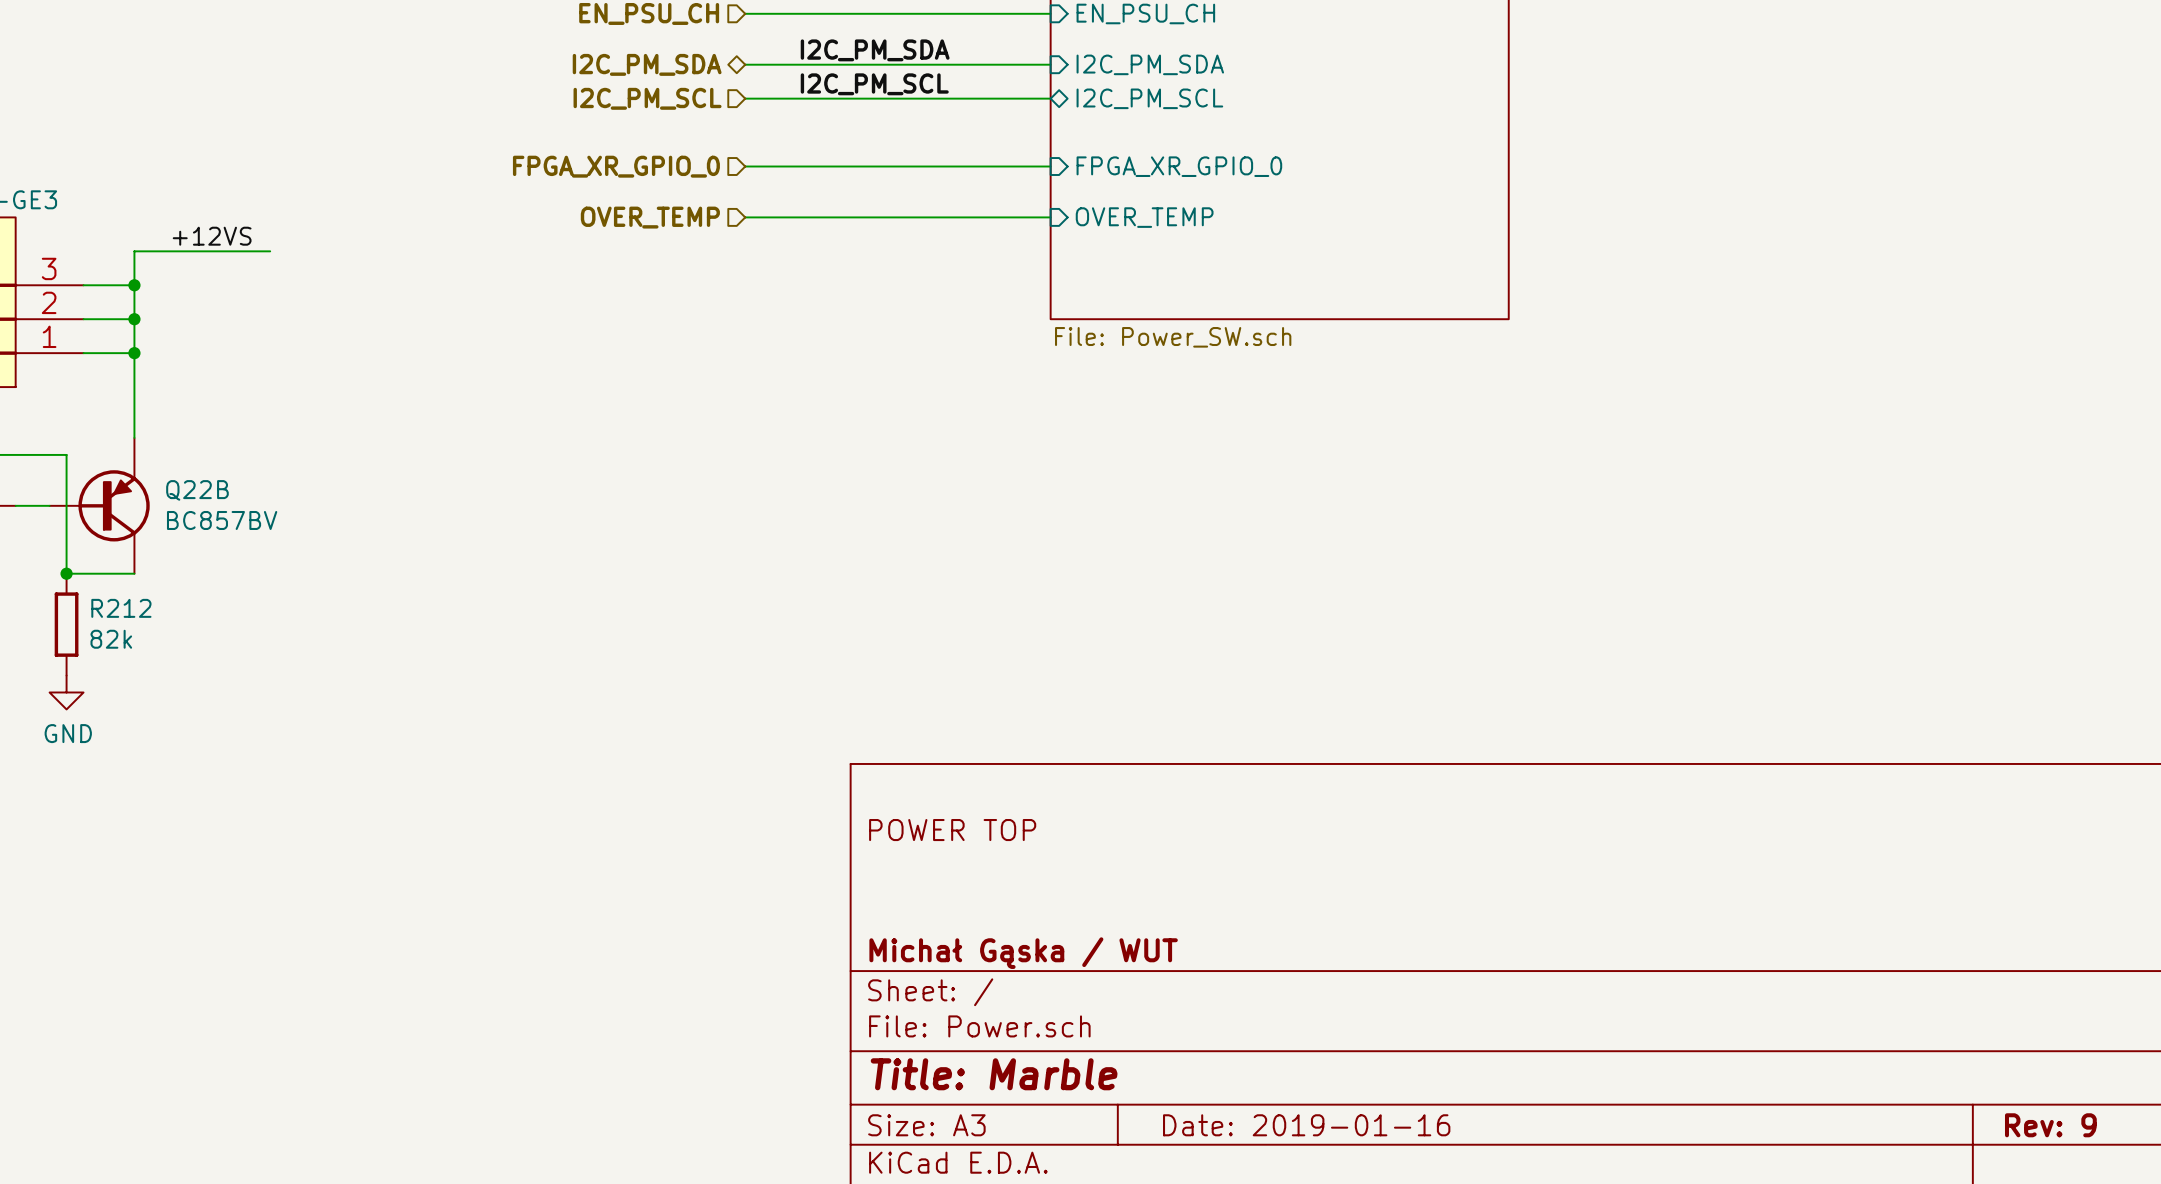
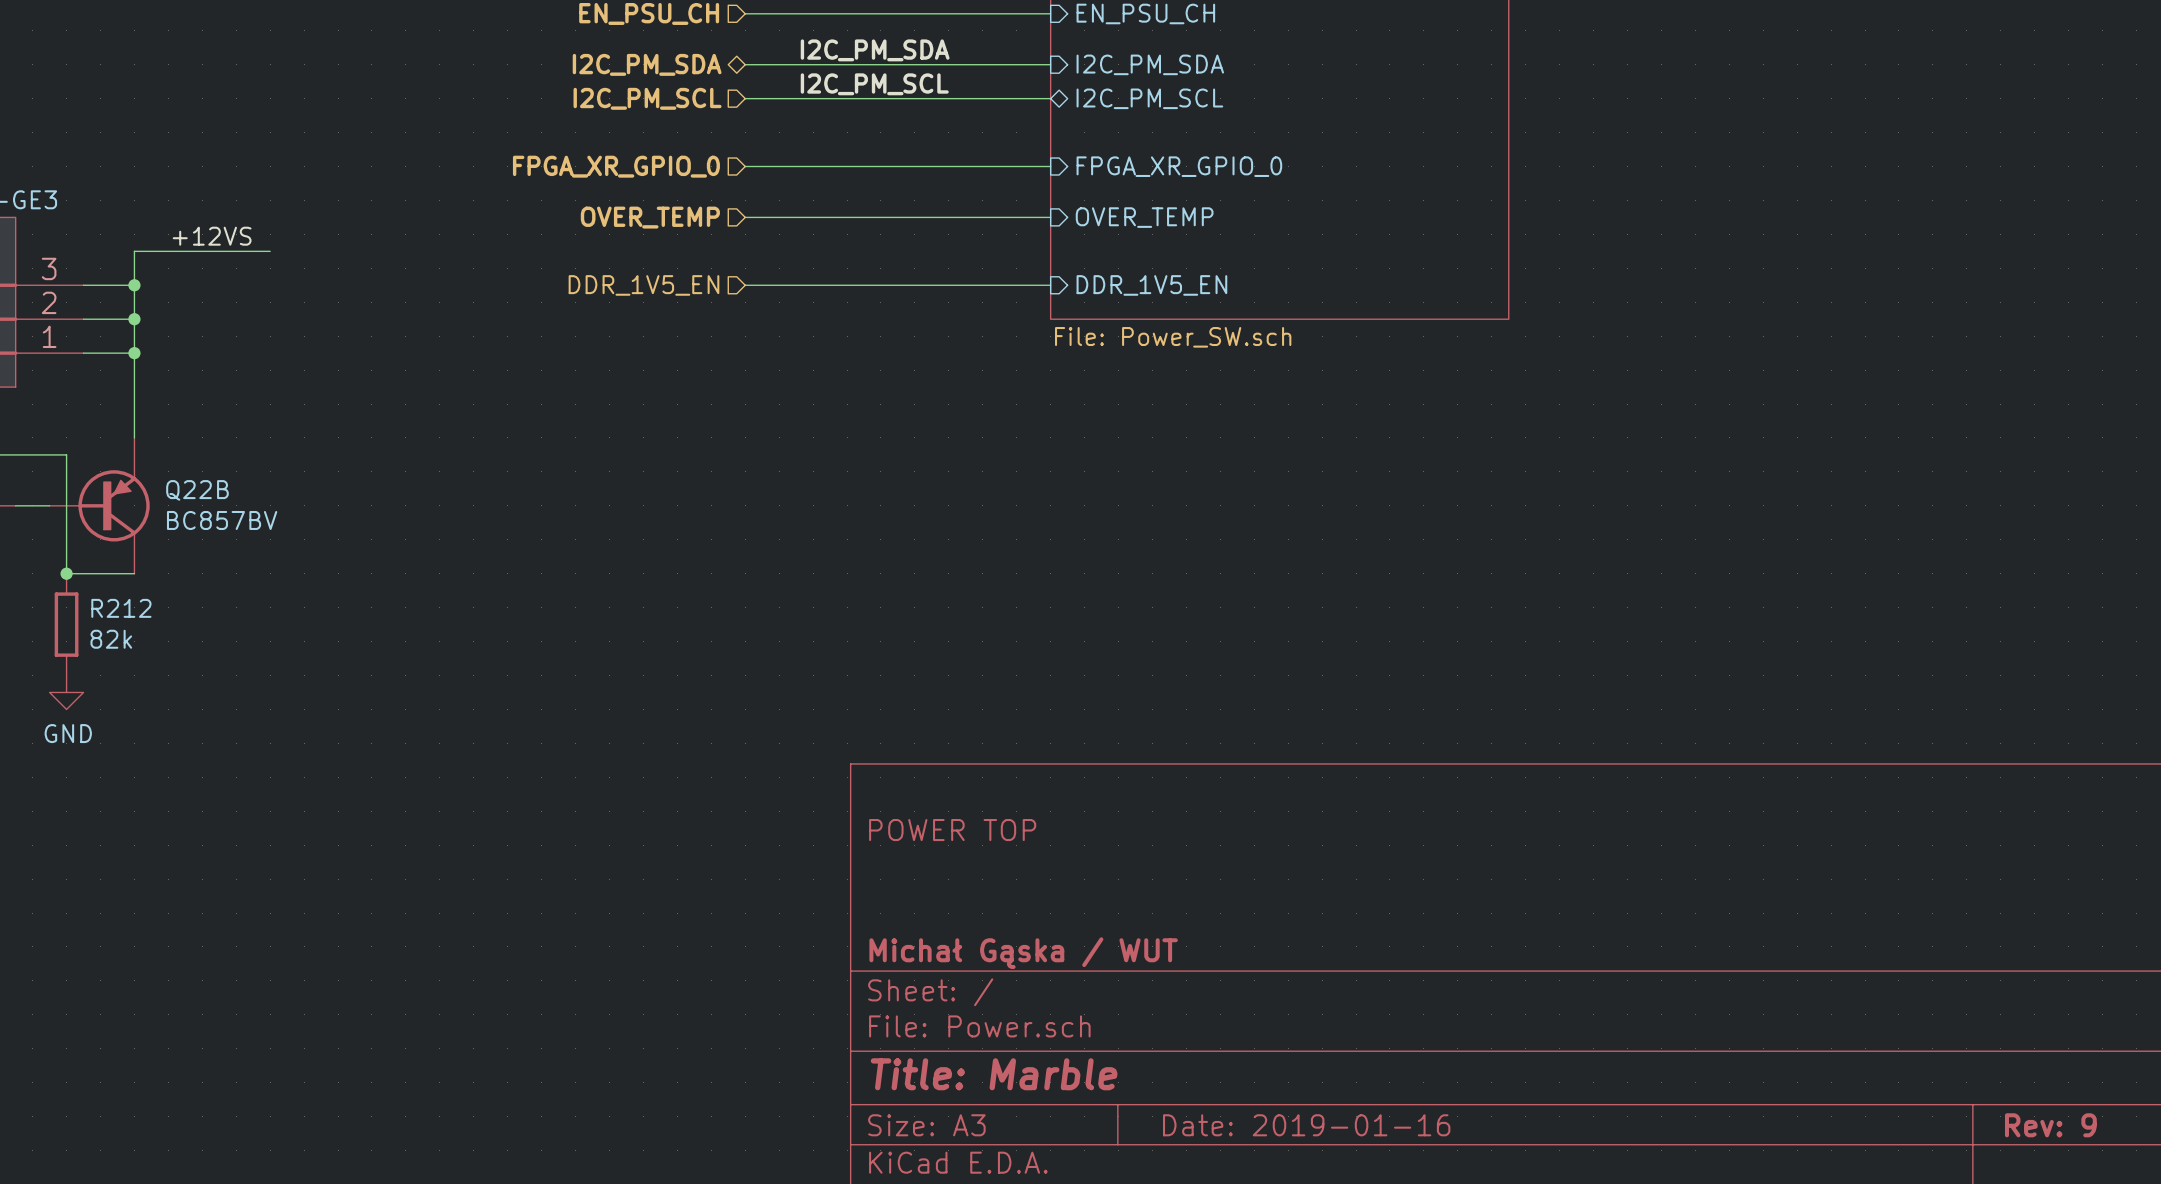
hierarchical label: none -> DDR_1V5_EN (643, 285)
wire: none -> (745, 285) (1050, 285)
sheet pin: none -> DDR_1V5_EN (1151, 285)

